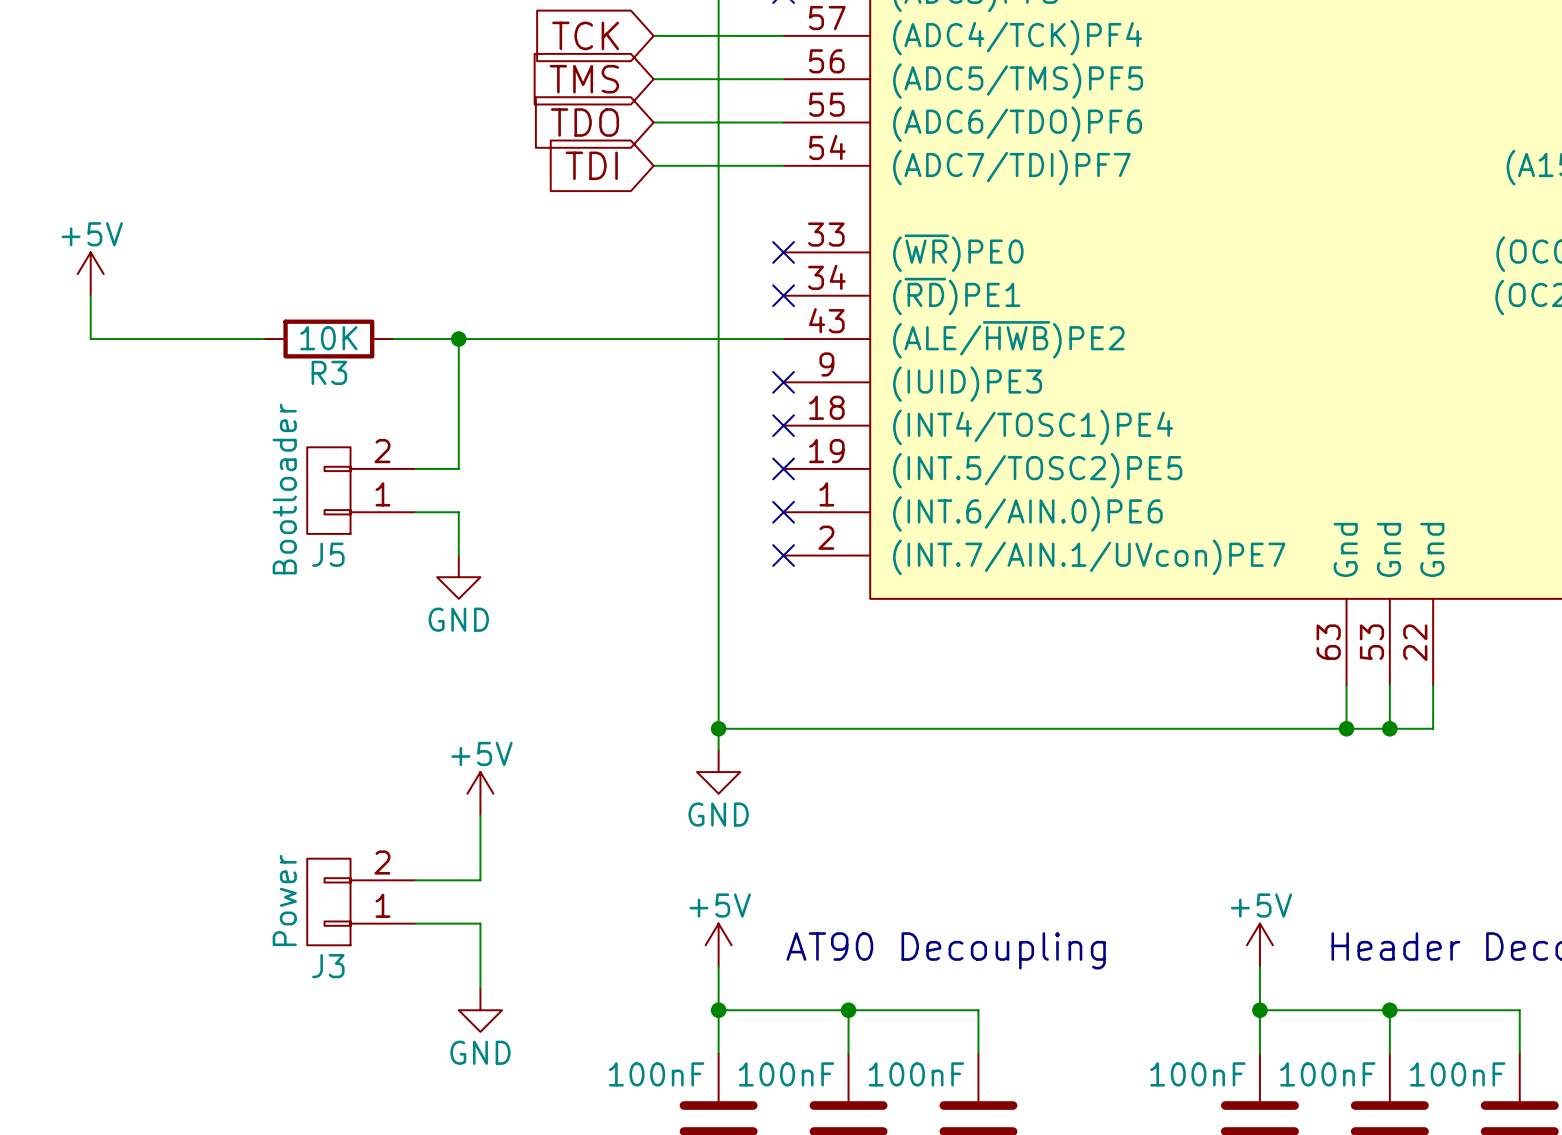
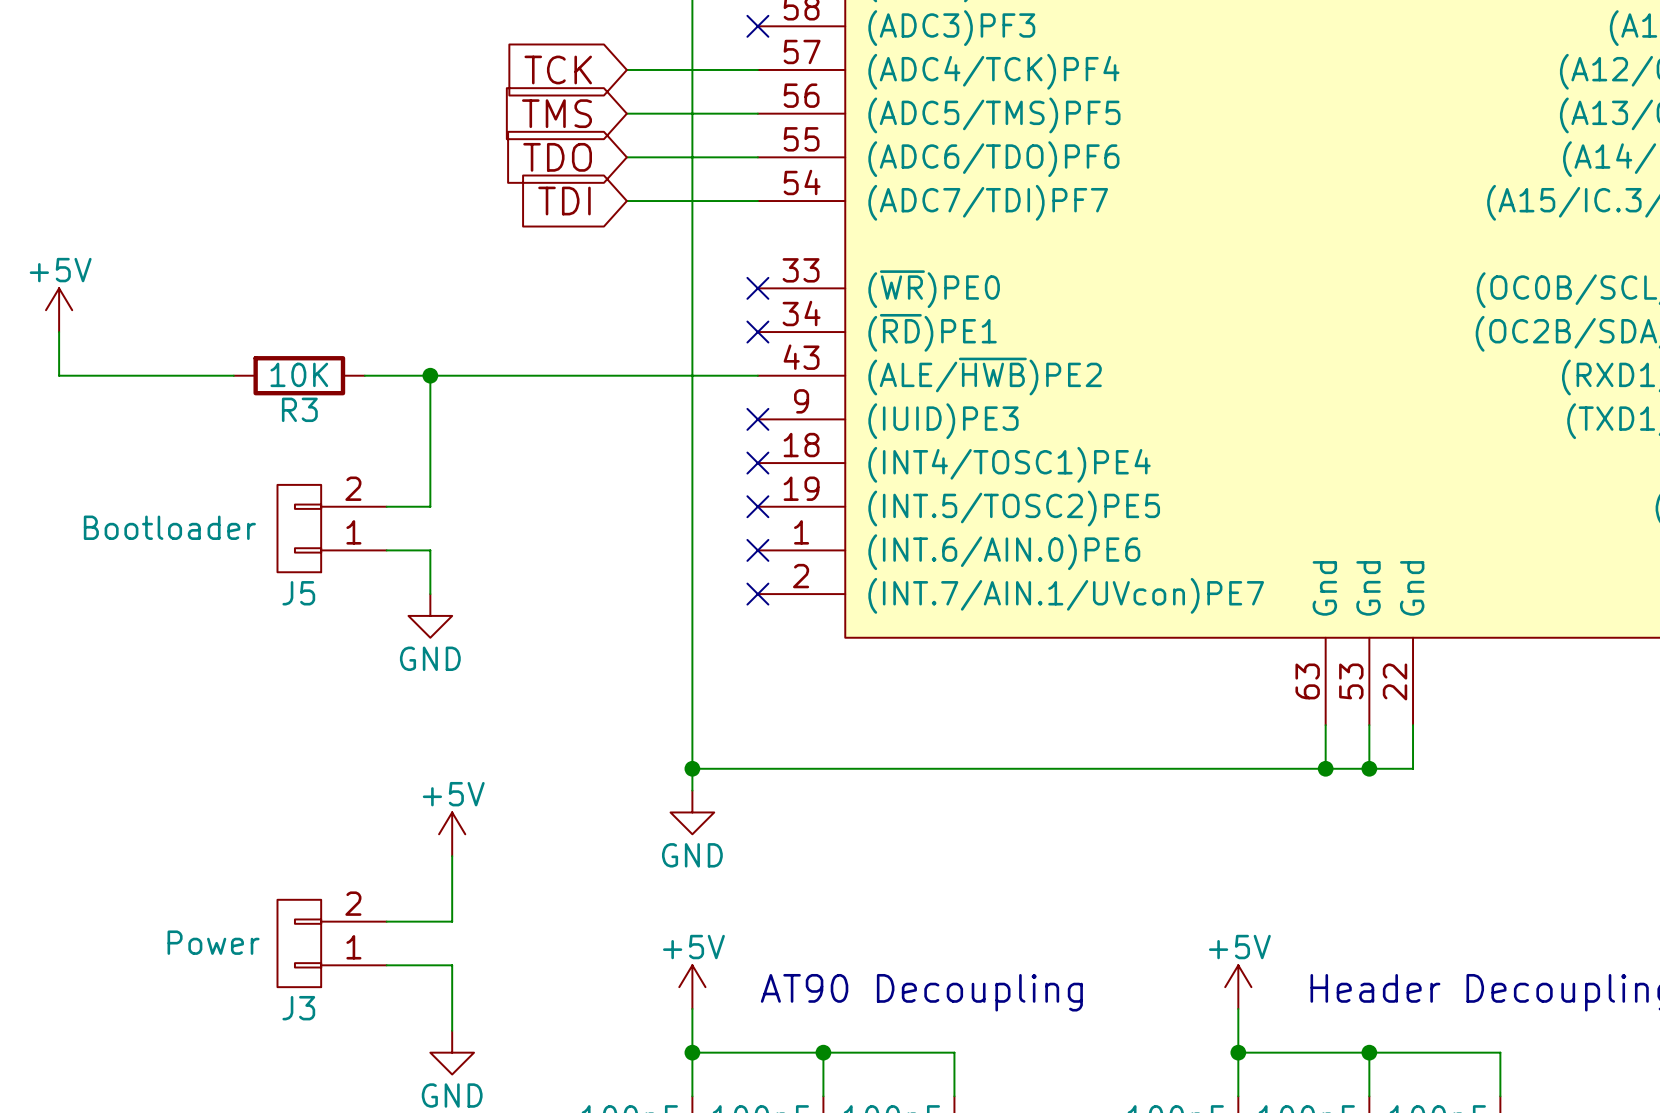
J5 value rotation: 0° (284, 489) -> 90° clockwise (169, 527)
J3 value rotation: 0° (284, 900) -> 90° clockwise (213, 942)

